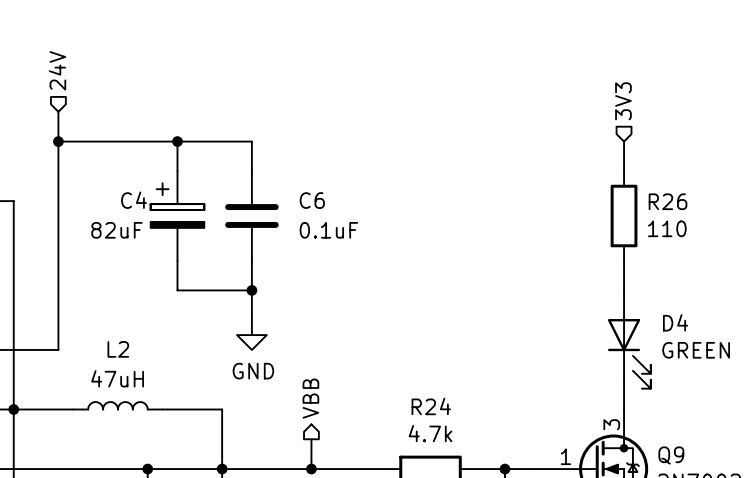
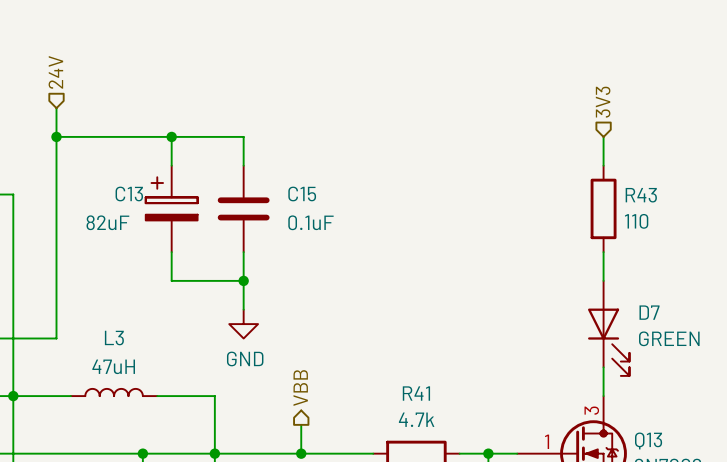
C4 name: C4 (134, 200) -> C13 (129, 193)
C6 name: C6 (312, 200) -> C15 (302, 193)
R26 name: R26 (668, 201) -> R43 (641, 195)
D4 name: D4 (675, 322) -> D7 (649, 312)
L2 name: L2 (118, 349) -> L3 (114, 338)
R24 name: R24 (431, 406) -> R41 (416, 393)
Q9 name: Q9 (671, 455) -> Q13 (648, 440)

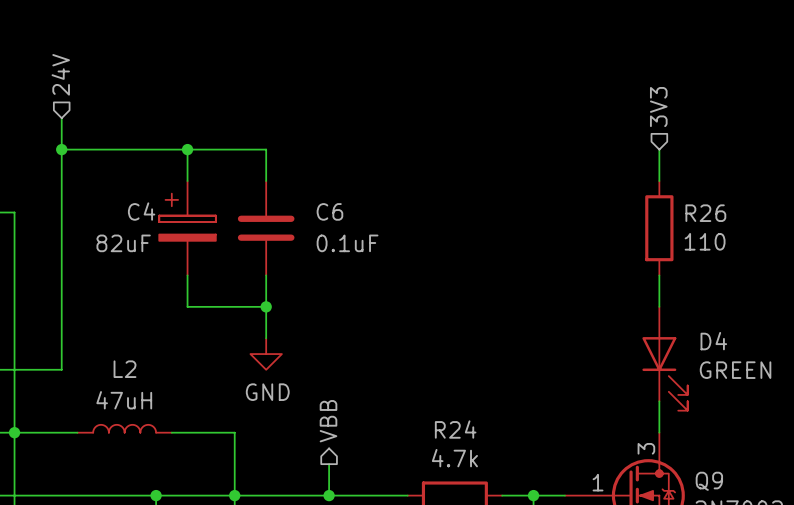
C13 name: C13 (129, 193) -> C4 (141, 211)
C15 name: C15 (302, 193) -> C6 (329, 211)
R43 name: R43 (641, 195) -> R26 (705, 213)
D7 name: D7 (649, 312) -> D4 (713, 341)
L3 name: L3 (114, 338) -> L2 (125, 369)
R41 name: R41 (416, 393) -> R24 (455, 429)
Q13 name: Q13 (648, 440) -> Q9 (709, 481)

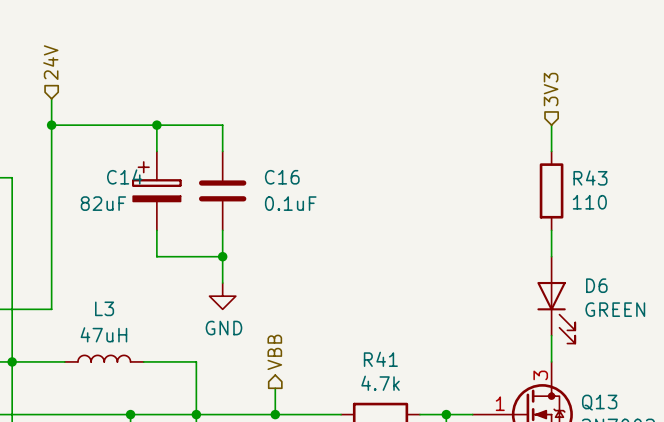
C4 name: C4 (141, 211) -> C14 (124, 176)
C6 name: C6 (329, 211) -> C16 (282, 177)
R26 name: R26 (705, 213) -> R43 (590, 178)
D4 name: D4 (713, 341) -> D6 (596, 285)
L2 name: L2 (125, 369) -> L3 (104, 308)
R24 name: R24 (455, 429) -> R41 (380, 359)
Q9 name: Q9 (709, 481) -> Q13 (599, 402)

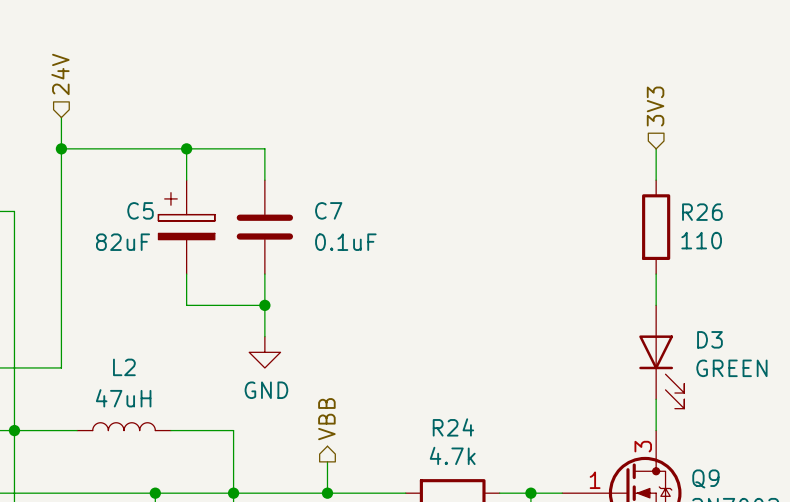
C14 name: C14 (124, 176) -> C5 (140, 210)
C16 name: C16 (282, 177) -> C7 (328, 210)
R43 name: R43 (590, 178) -> R26 (702, 212)
D6 name: D6 (596, 285) -> D3 (709, 339)
L3 name: L3 (104, 308) -> L2 (124, 367)
R41 name: R41 (380, 359) -> R24 (453, 427)
Q13 name: Q13 (599, 402) -> Q9 (705, 478)

